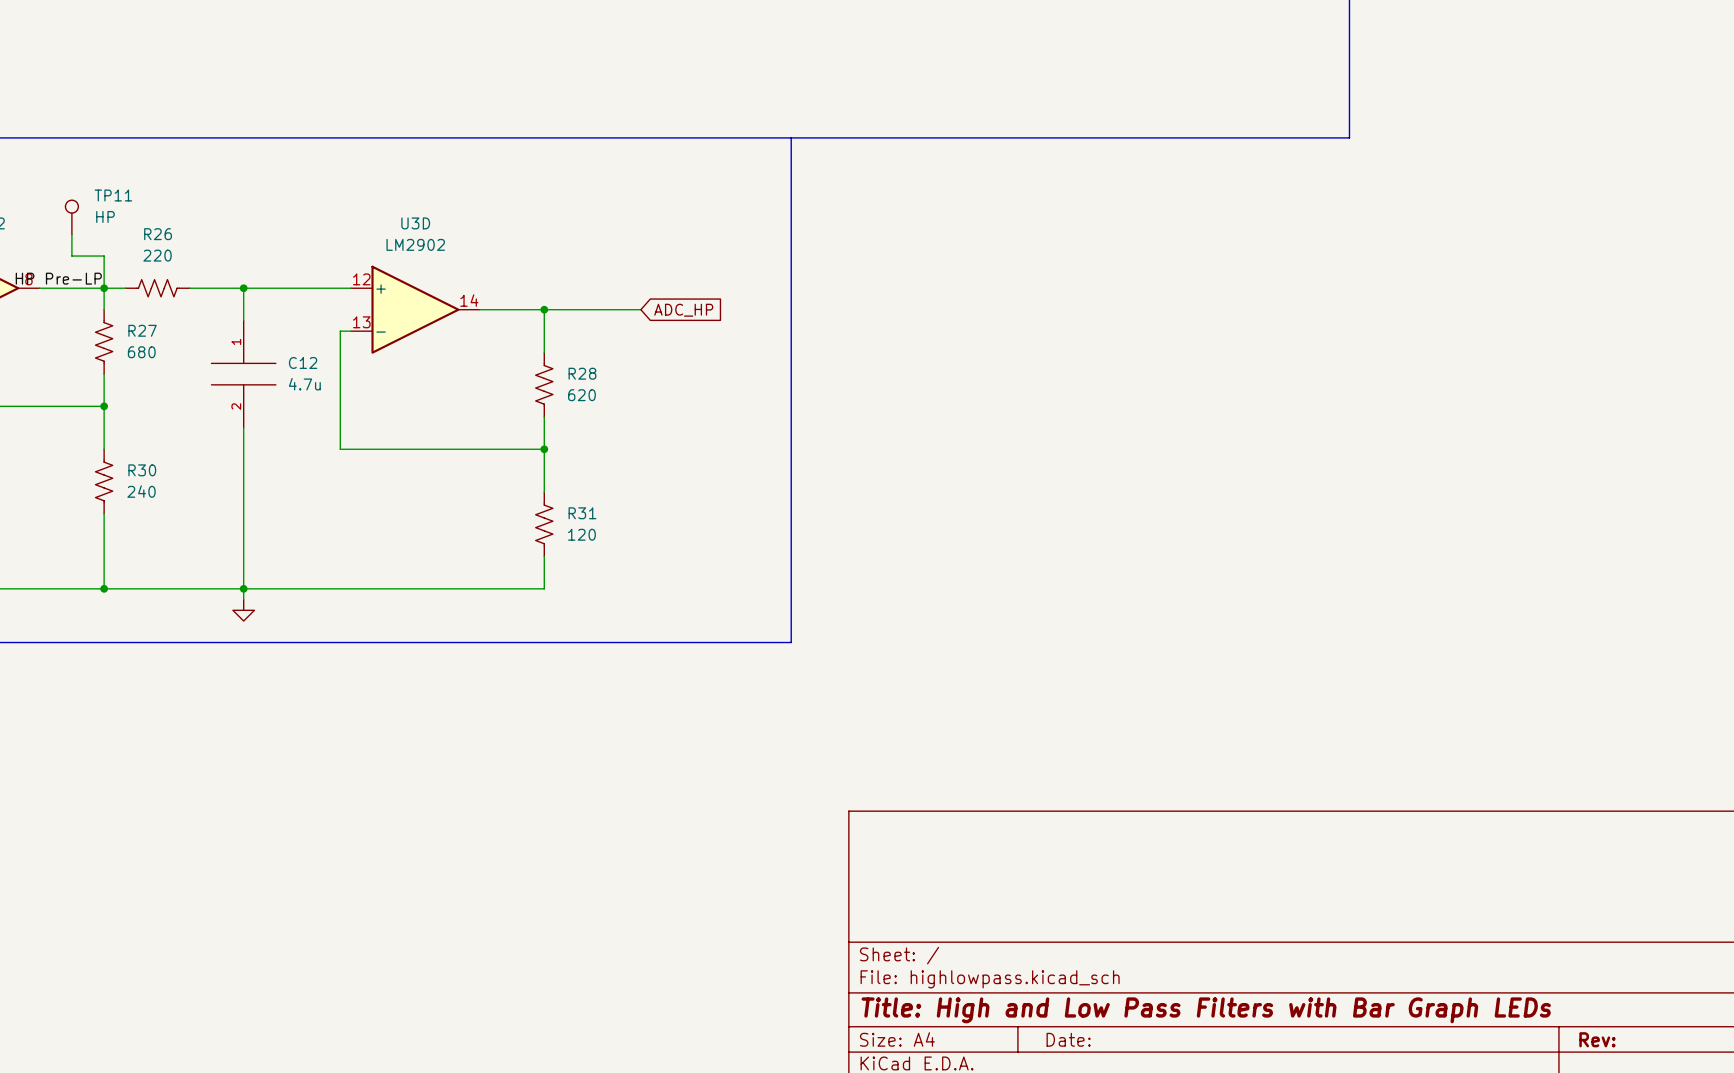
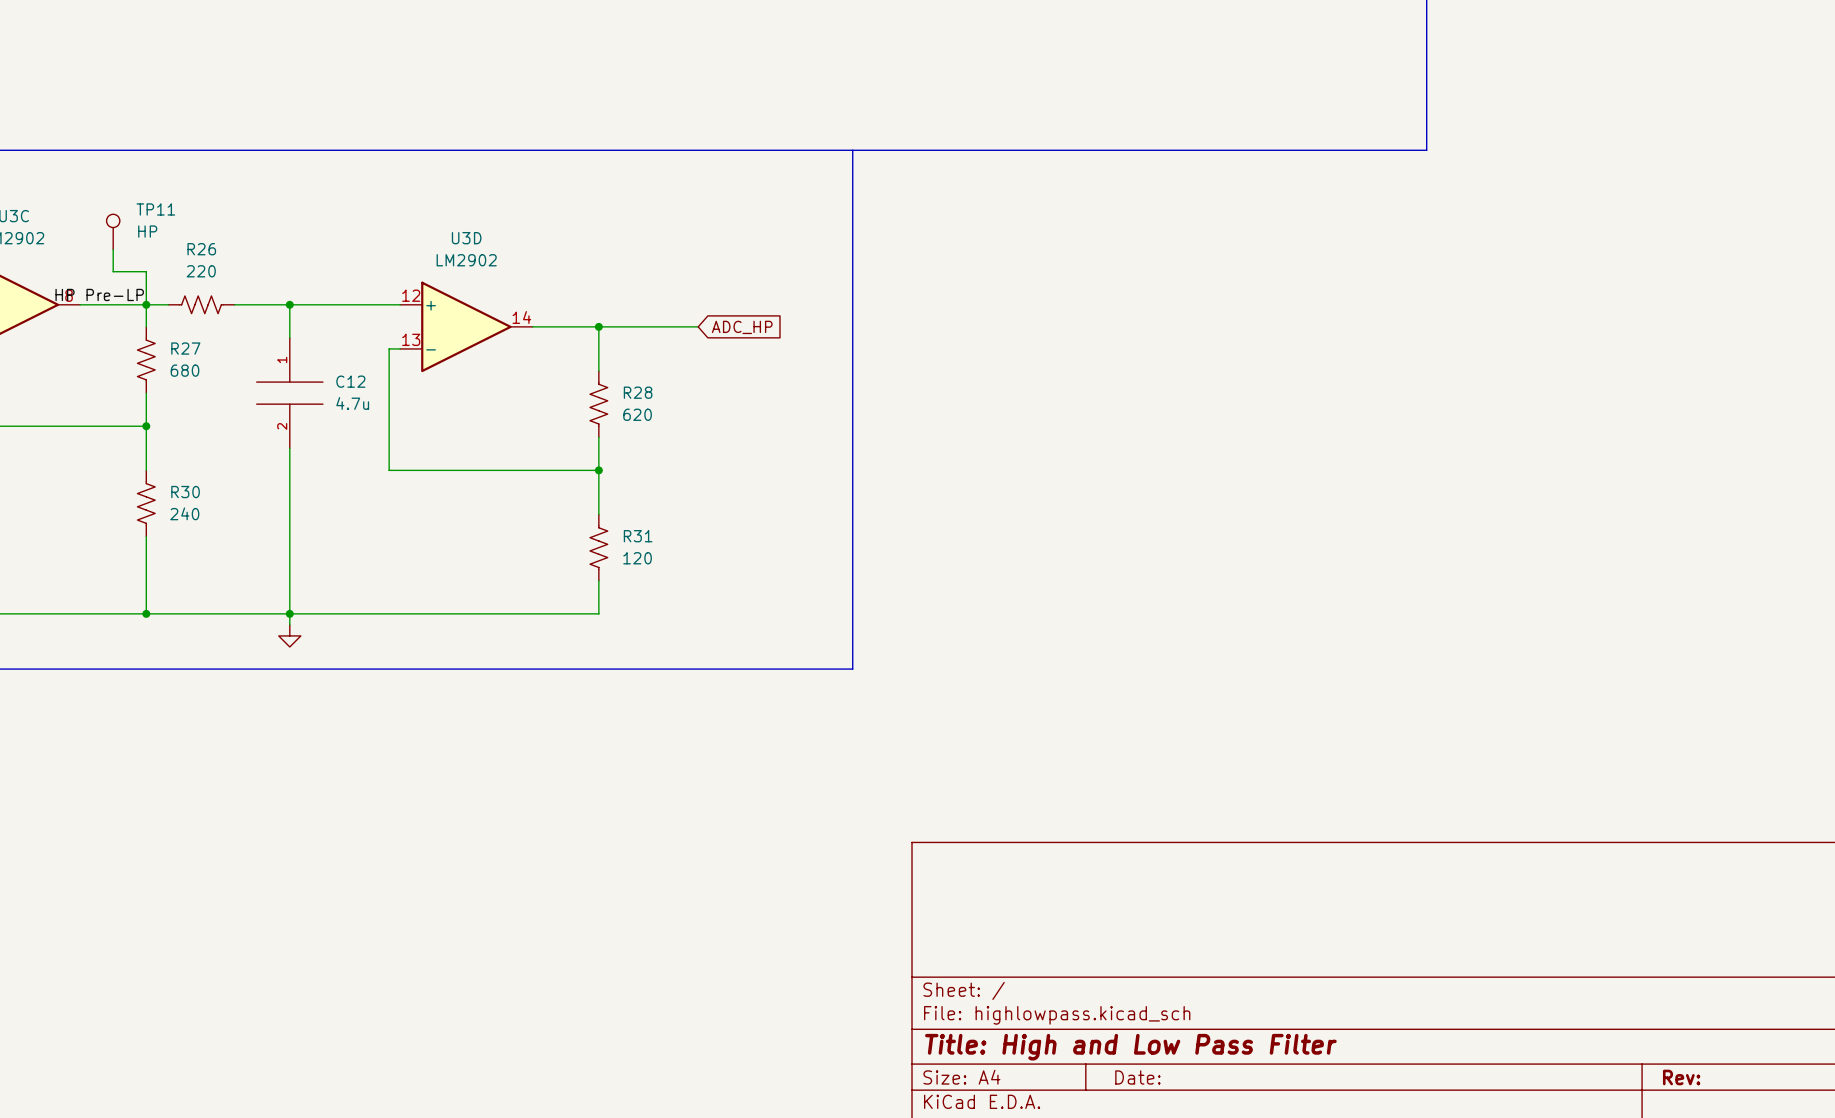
title block: Title: High and Low Pass Filters with Bar Graph LEDs (1206, 1010) -> Title: High and Low Pass Filter (1130, 1047)

